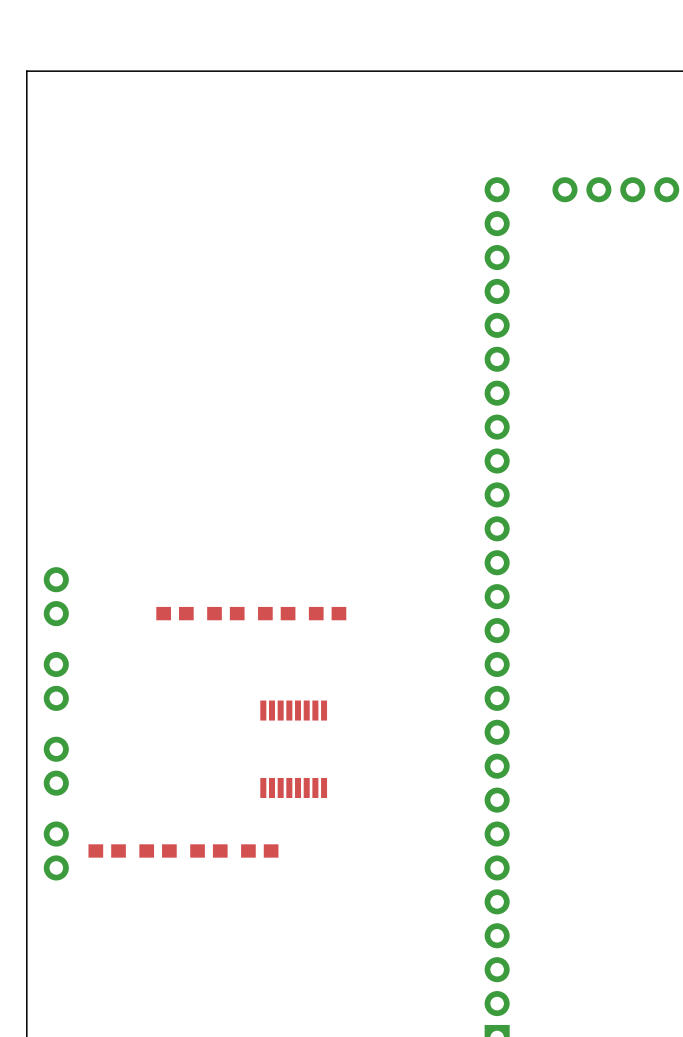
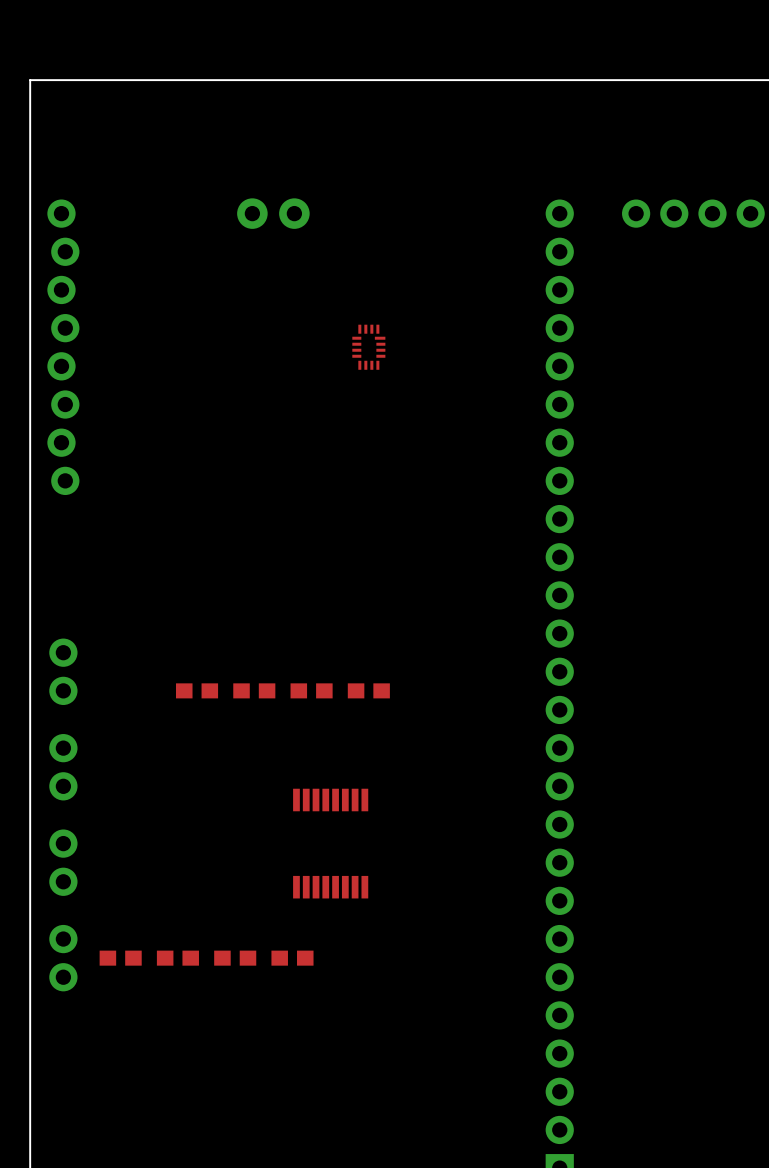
part: none -> (273, 213)
part: none -> (63, 347)
part: none -> (368, 347)

